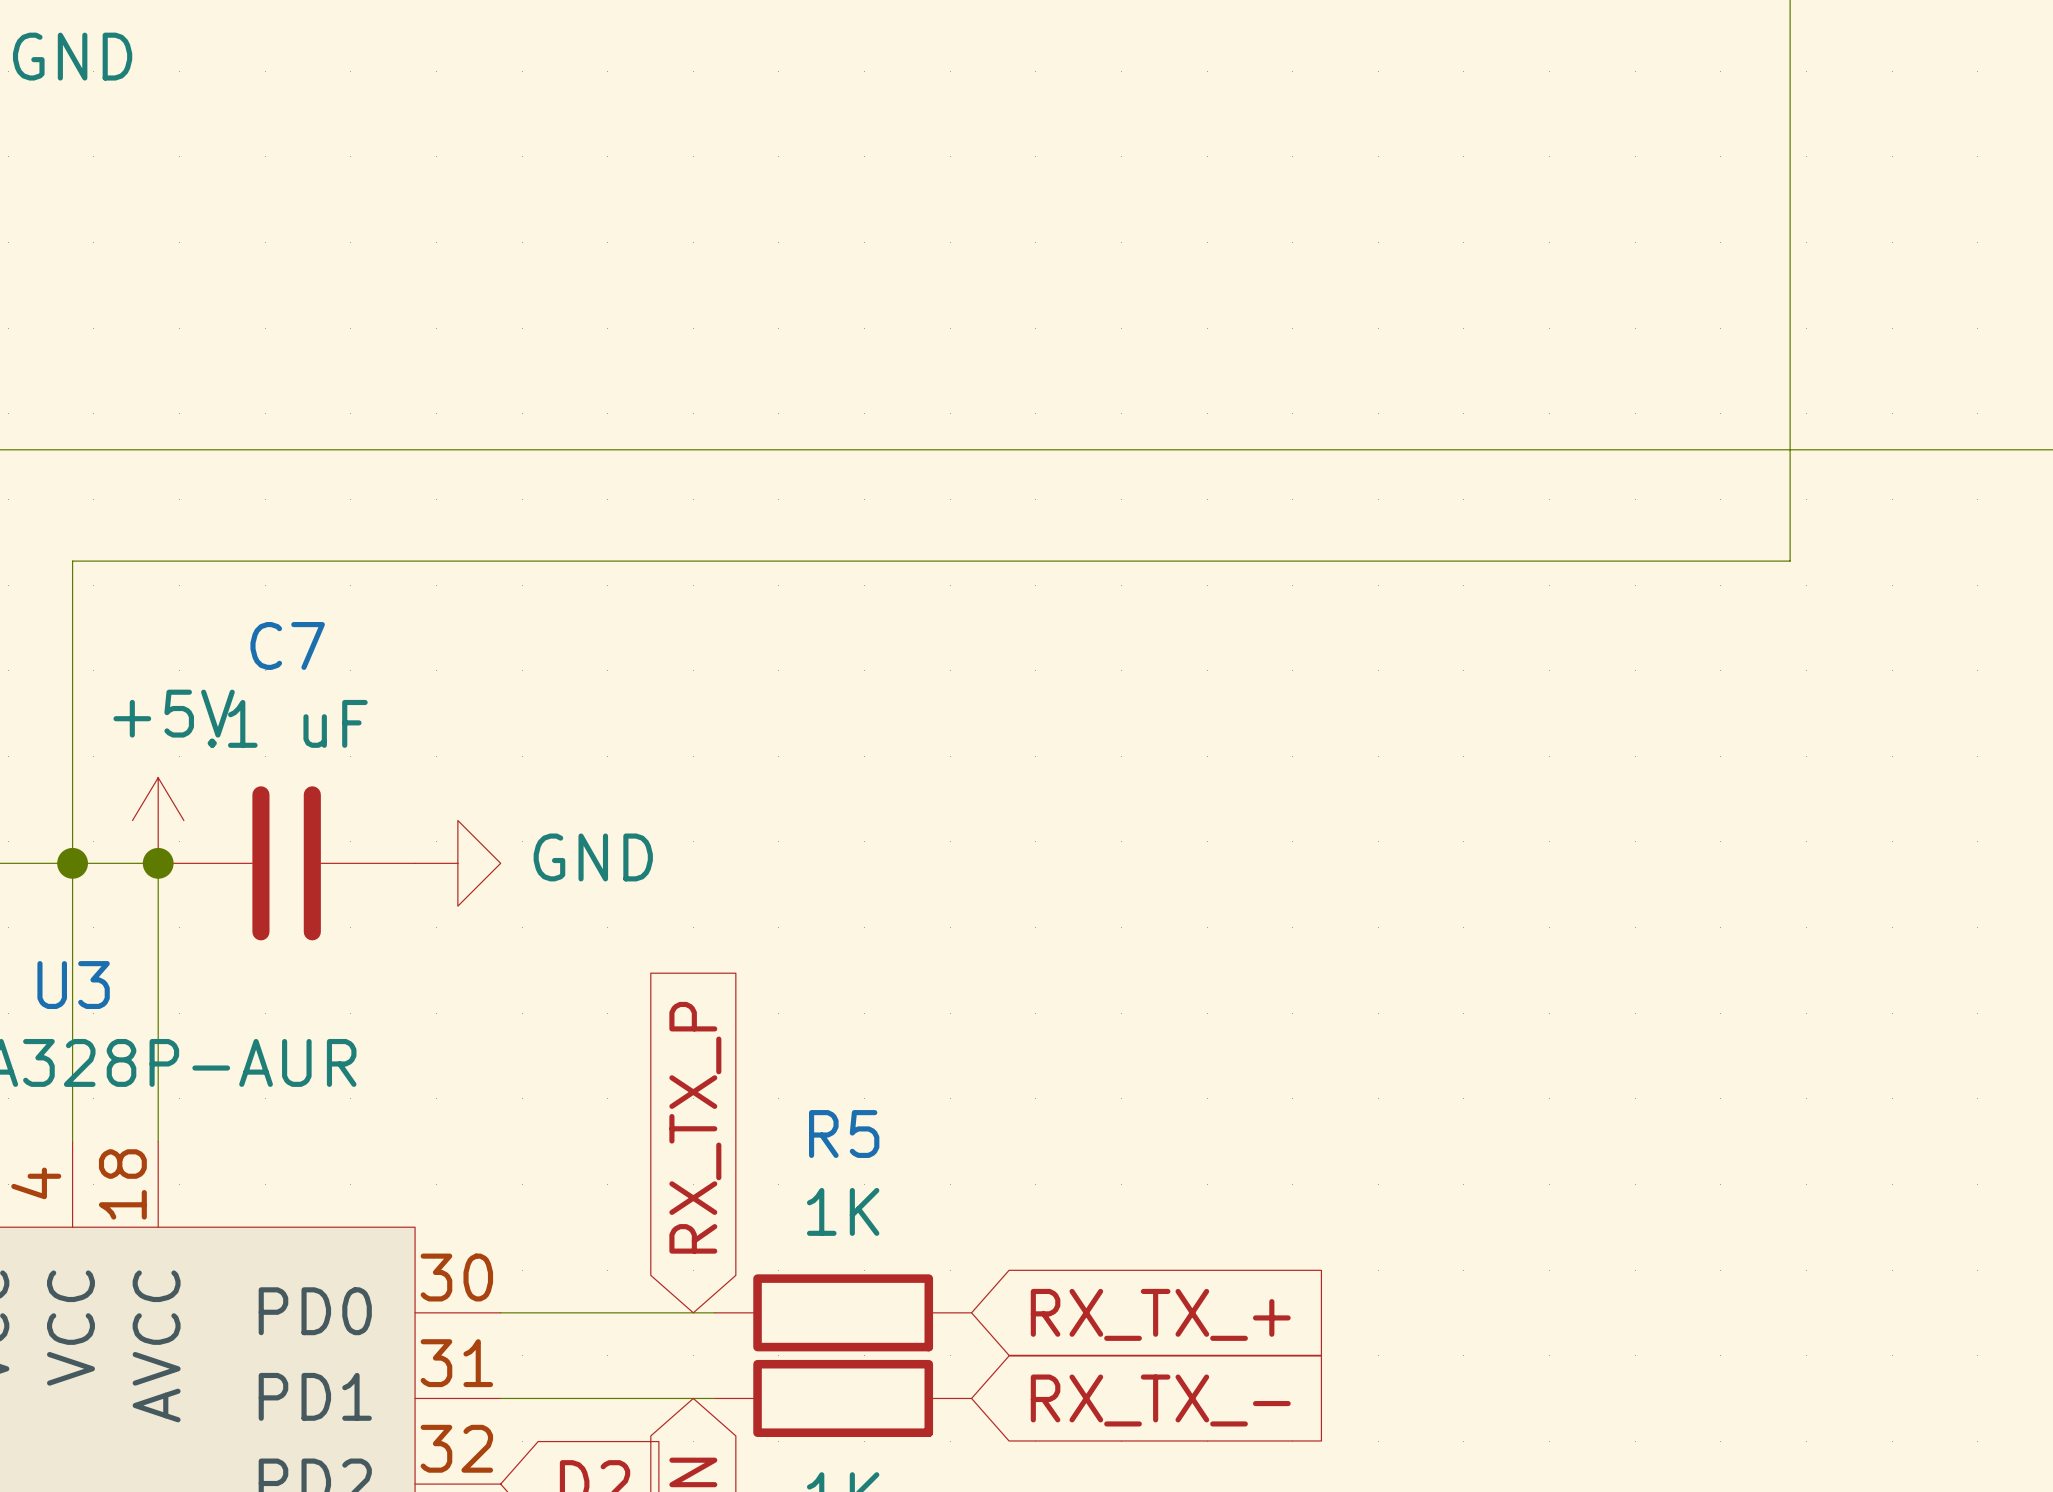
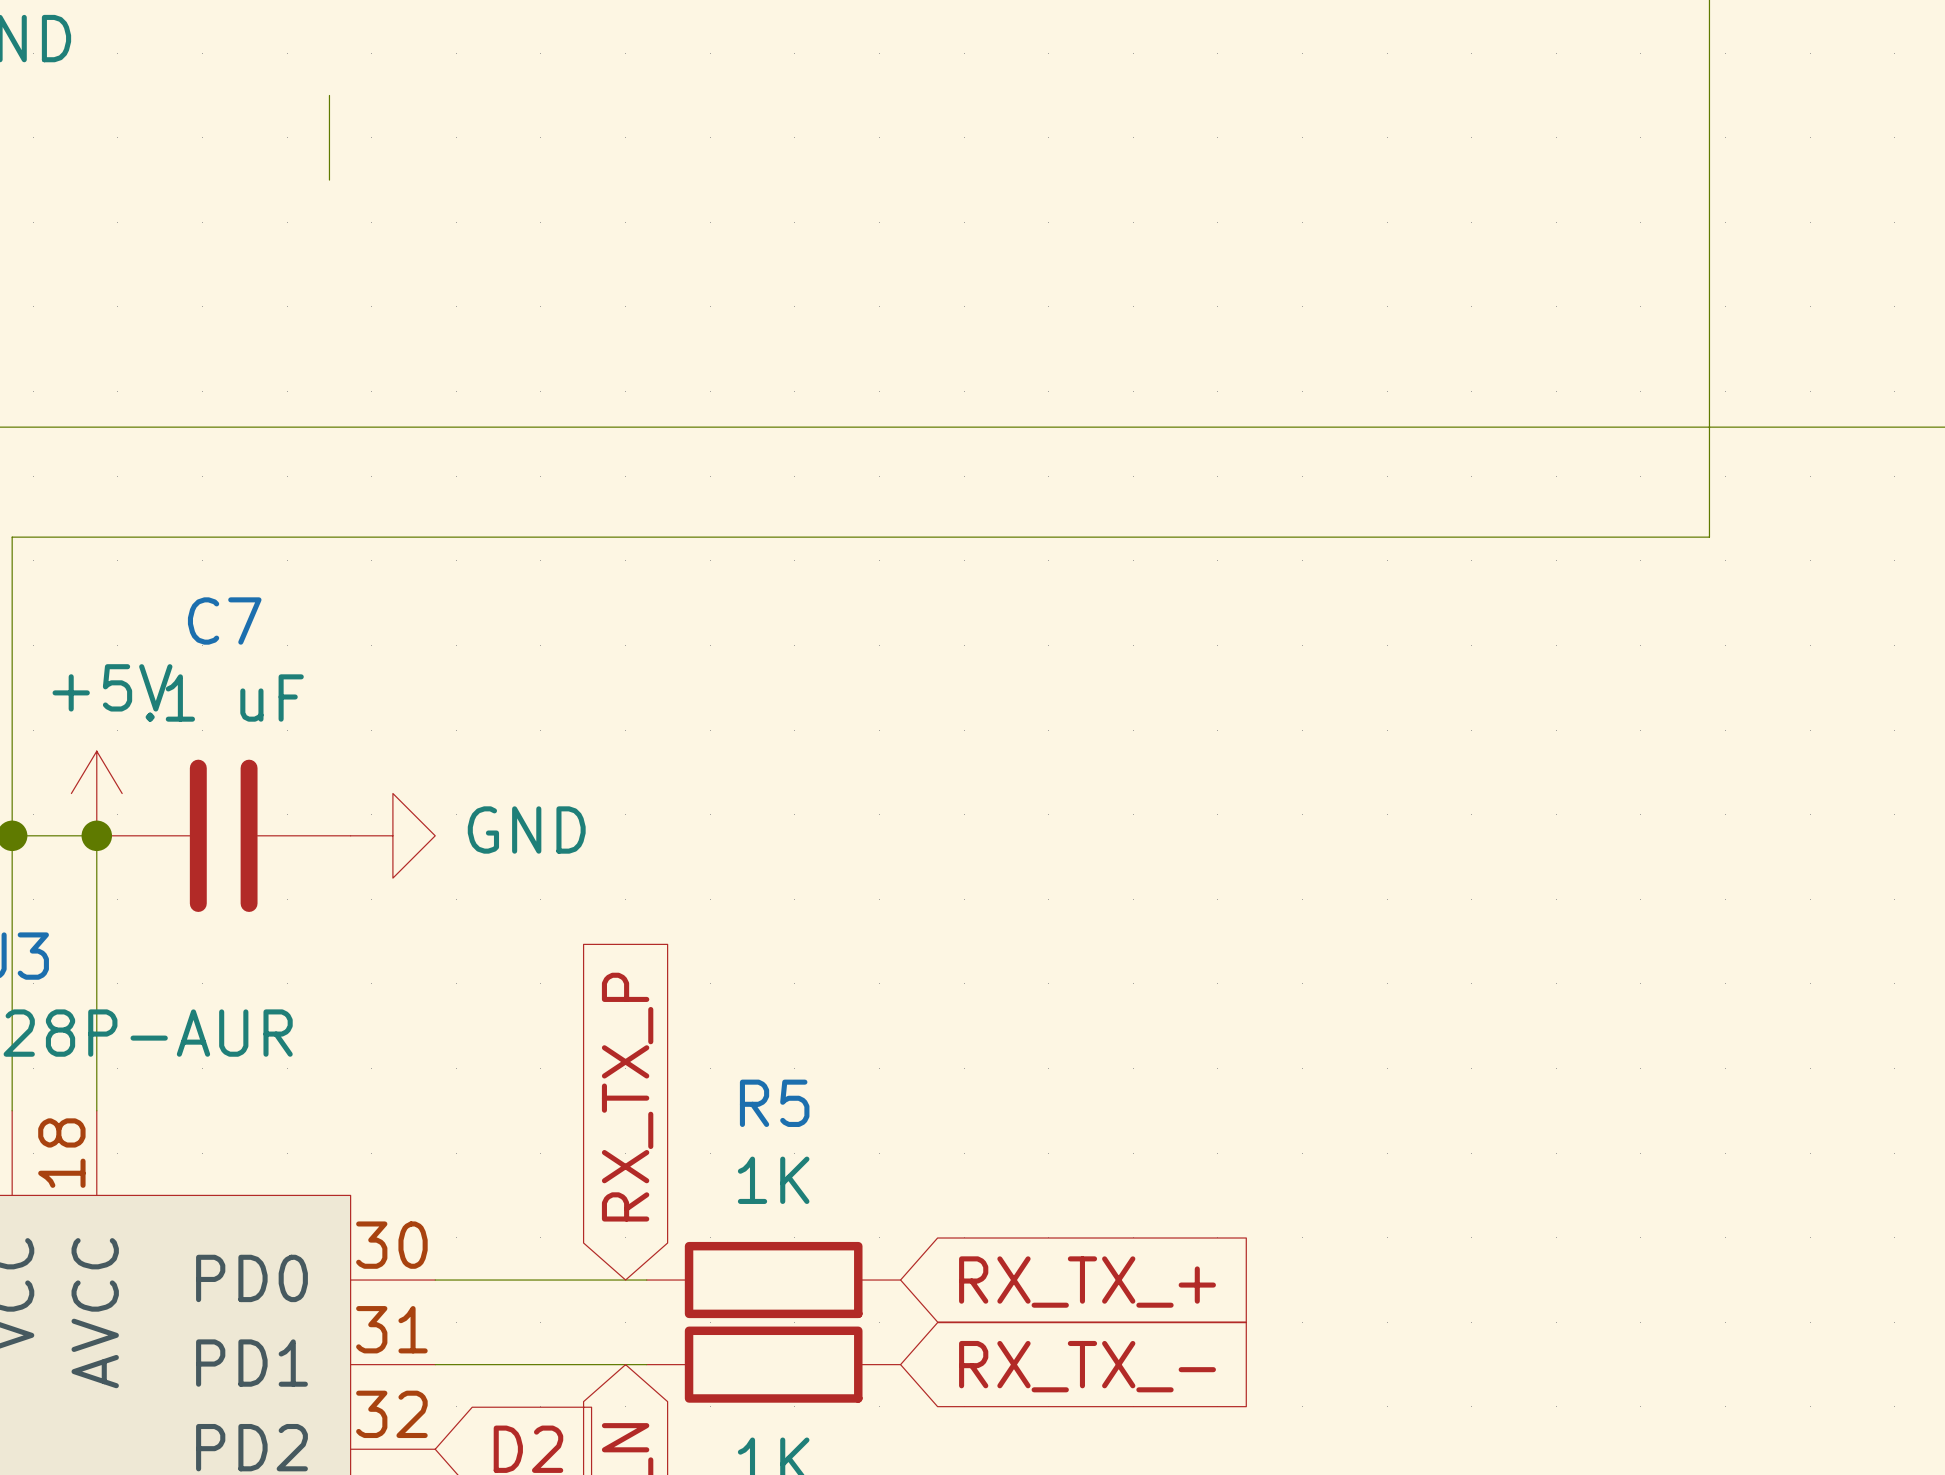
wire: none -> (329, 95) (329, 180)

